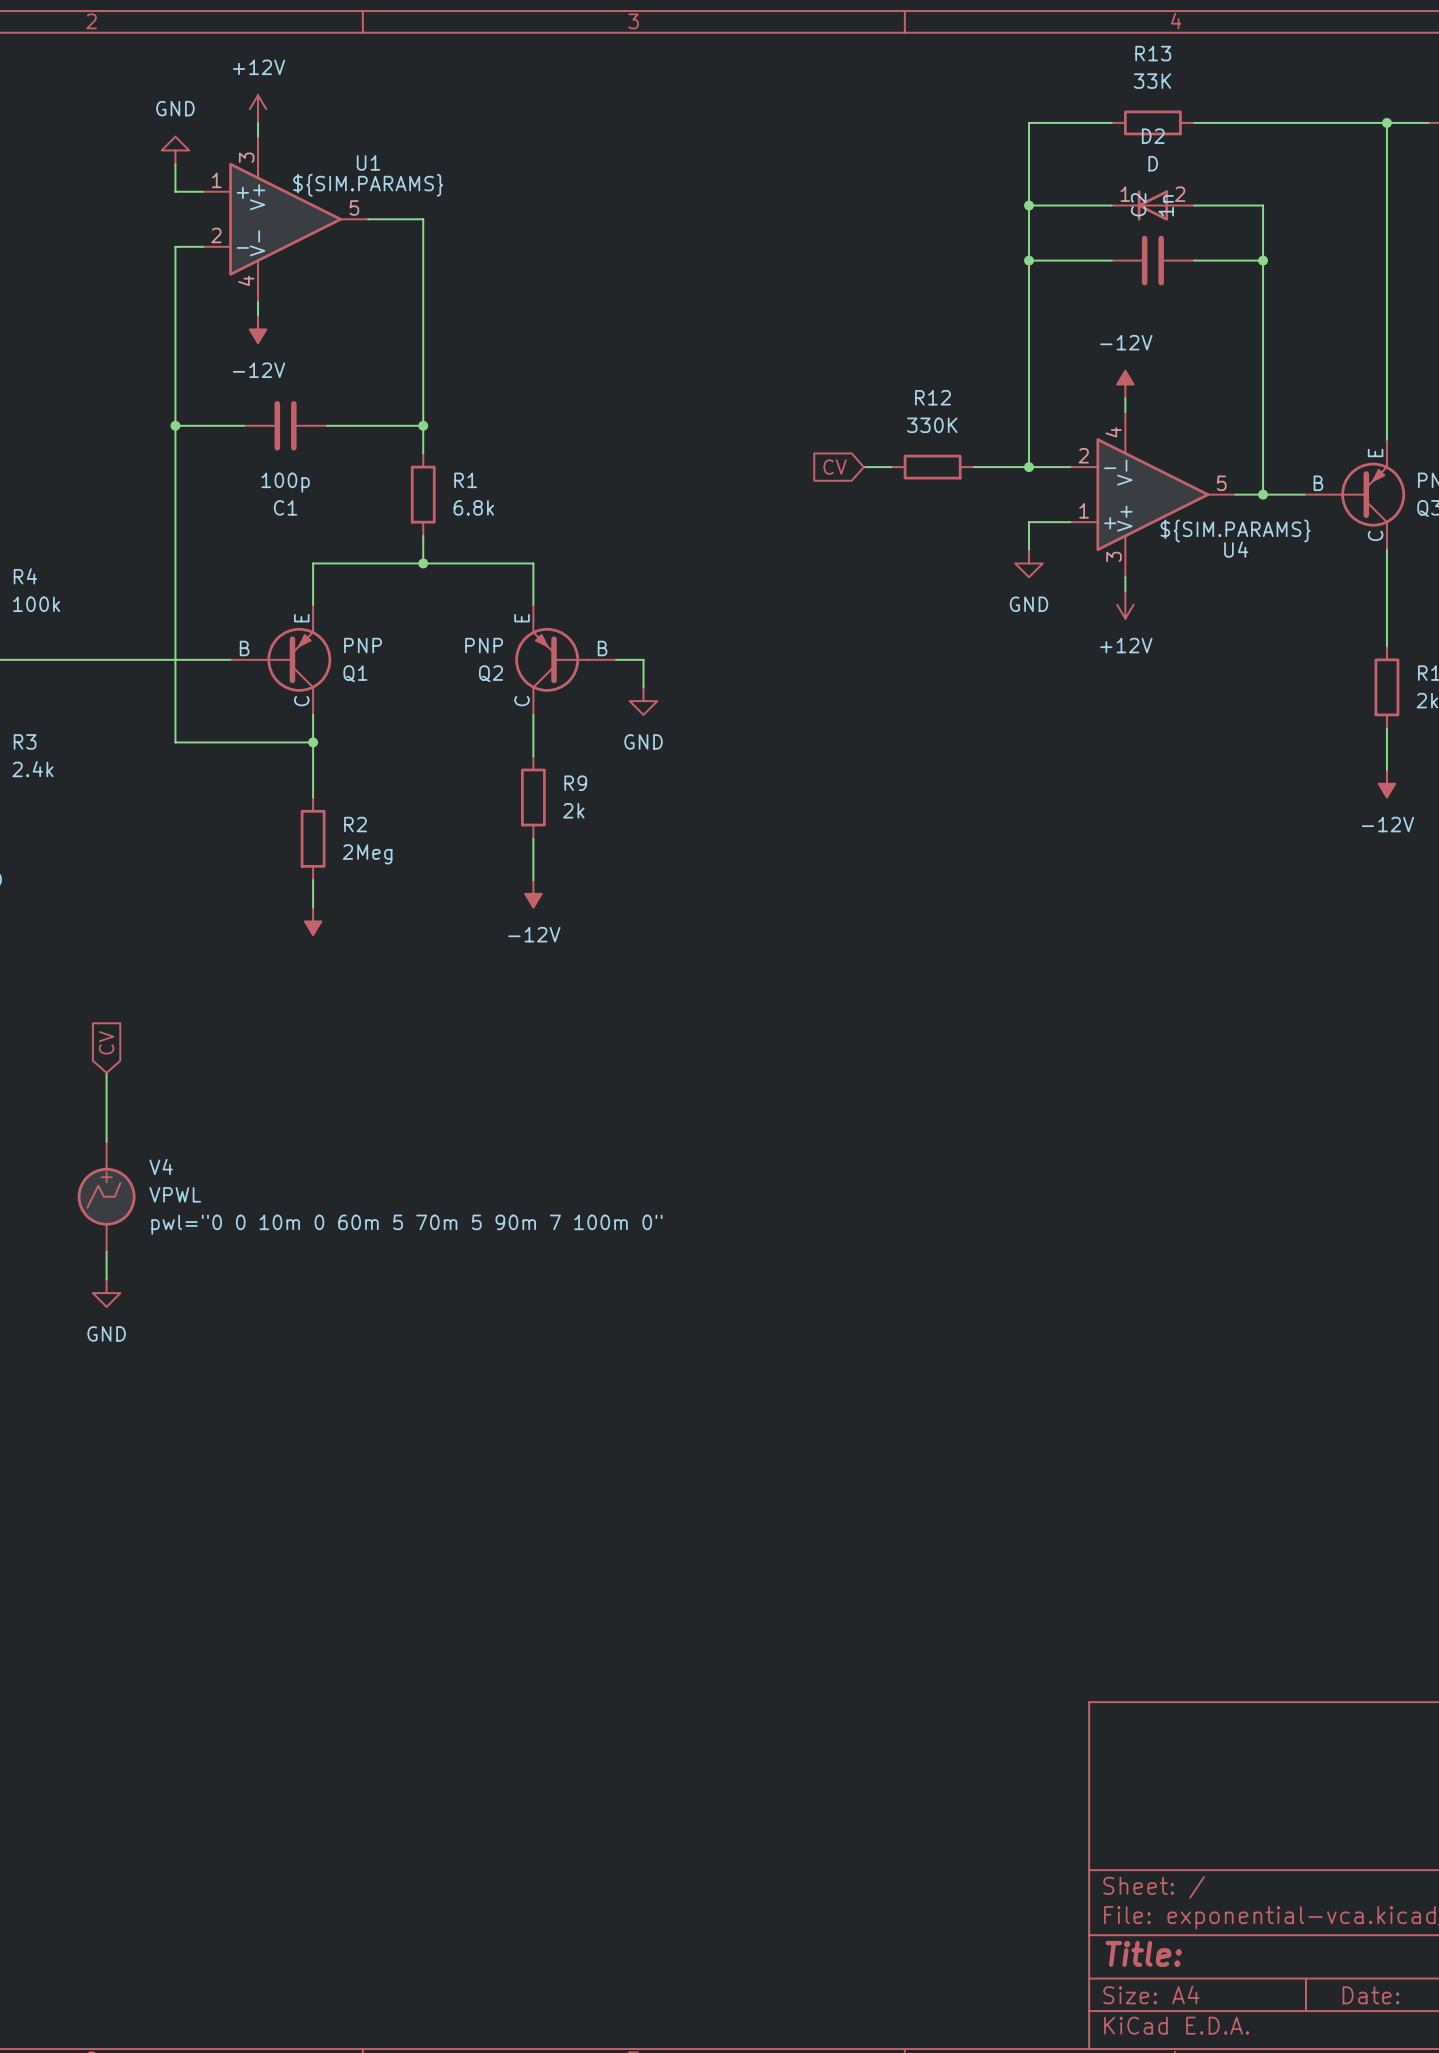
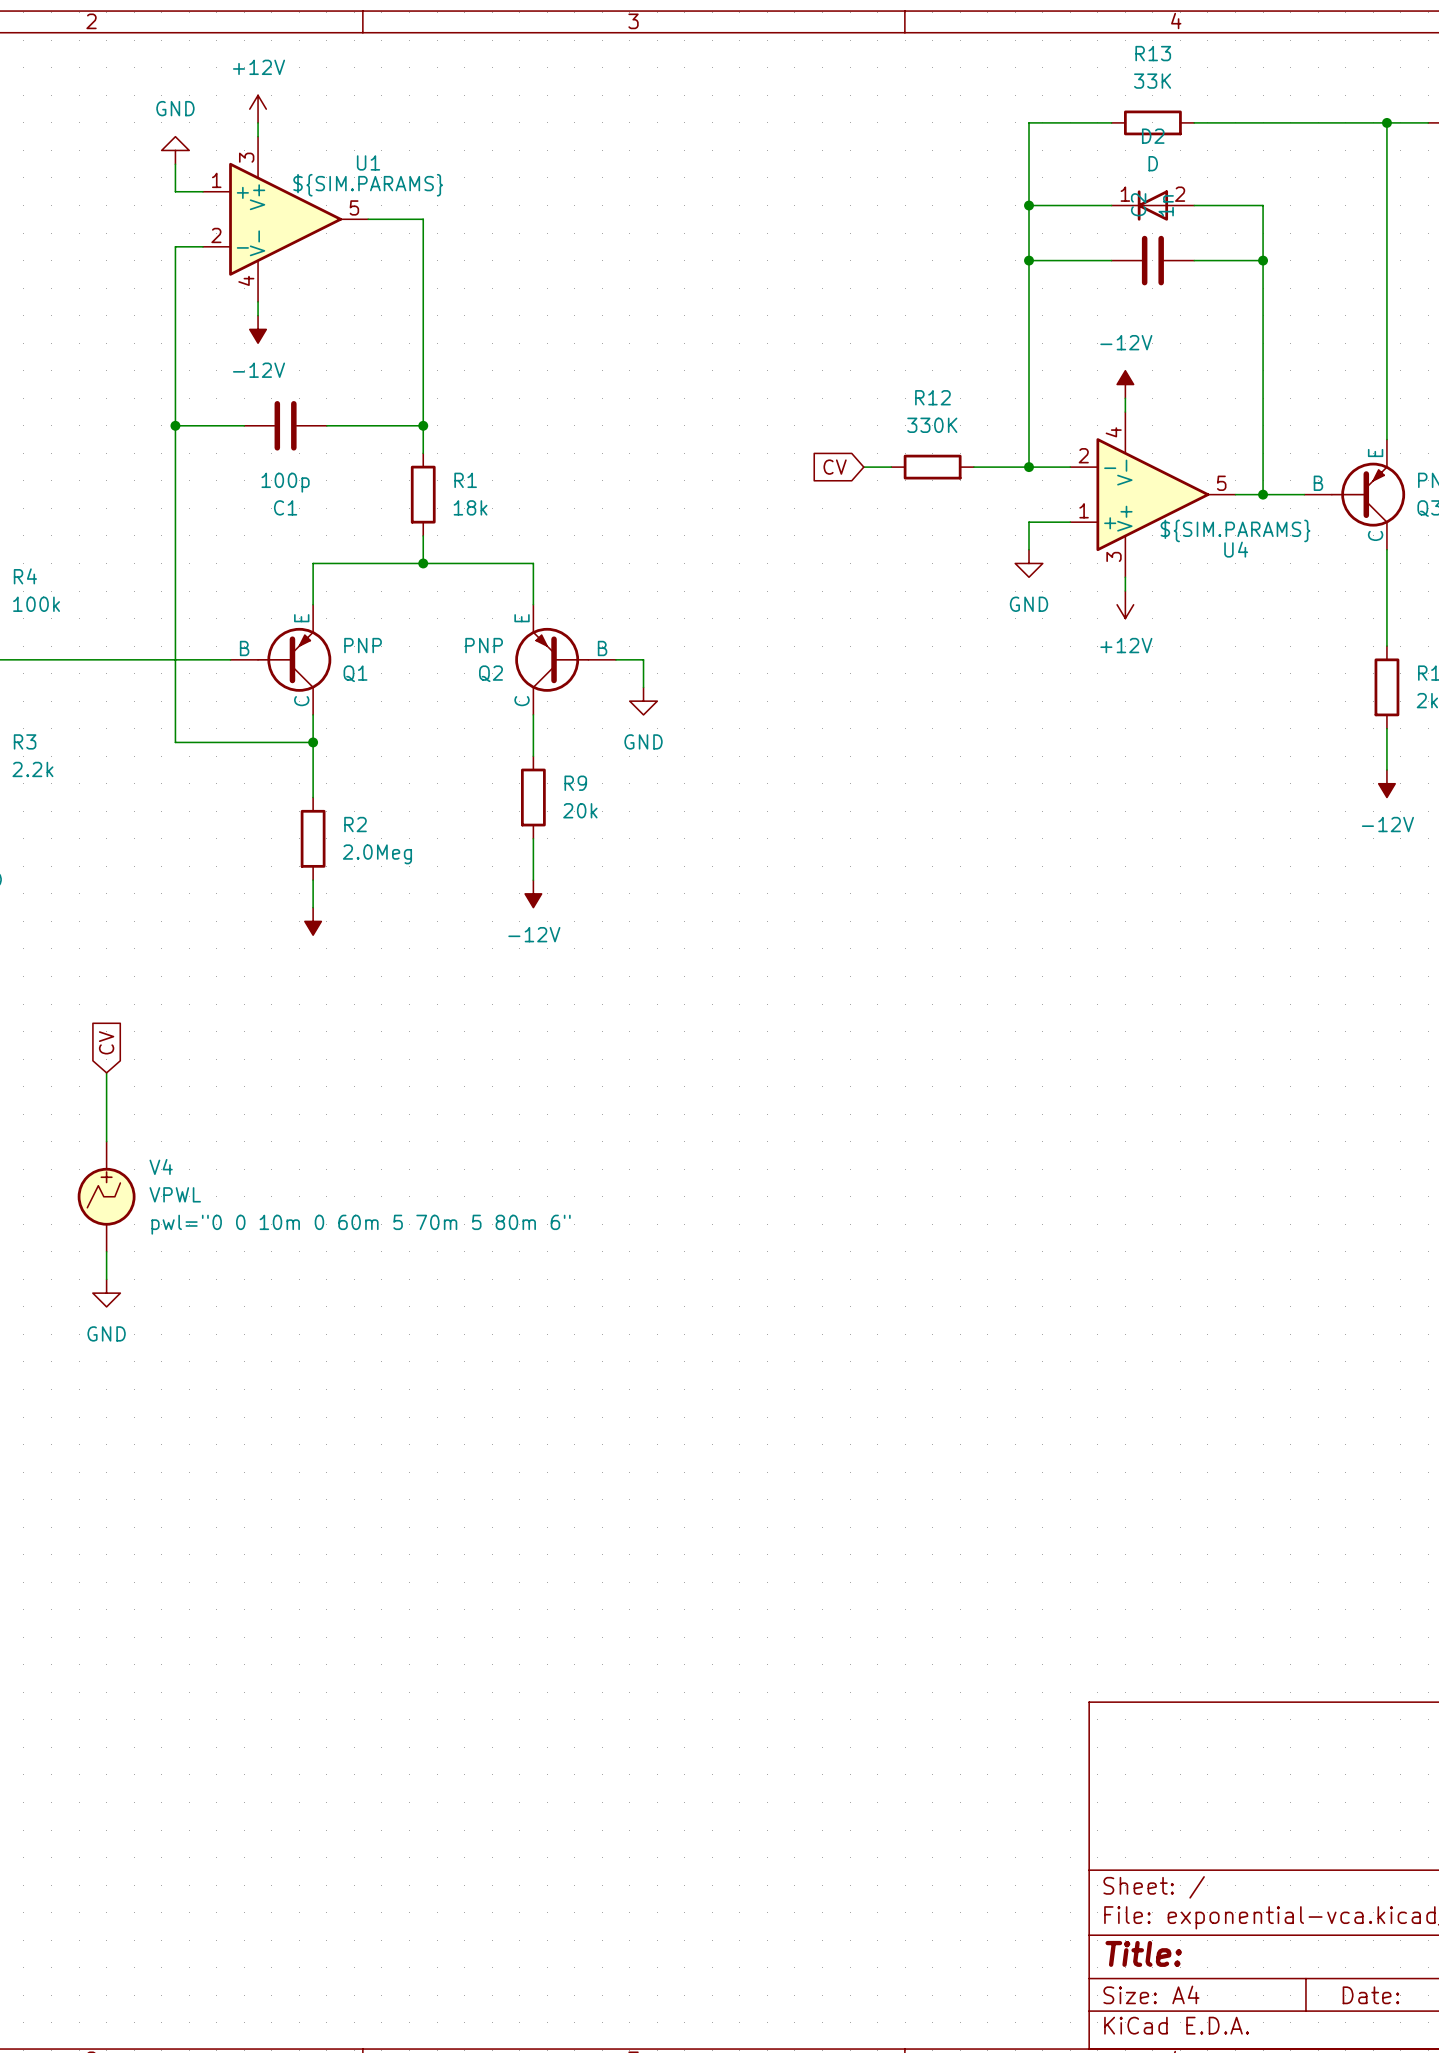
R1 value: 6.8k (473, 507) -> 18k (470, 507)
R3 value: 2.4k (32, 769) -> 2.2k (32, 769)
R9 value: 2k (573, 810) -> 20k (580, 810)
R2 value: 2Meg (367, 854) -> 2.0Meg (377, 854)
V4 text: pwl="0 0 10m 0 60m 5 70m 5 90m 7 100m 0" (406, 1224) -> pwl="0 0 10m 0 60m 5 70m 5 80m 6" (361, 1224)

